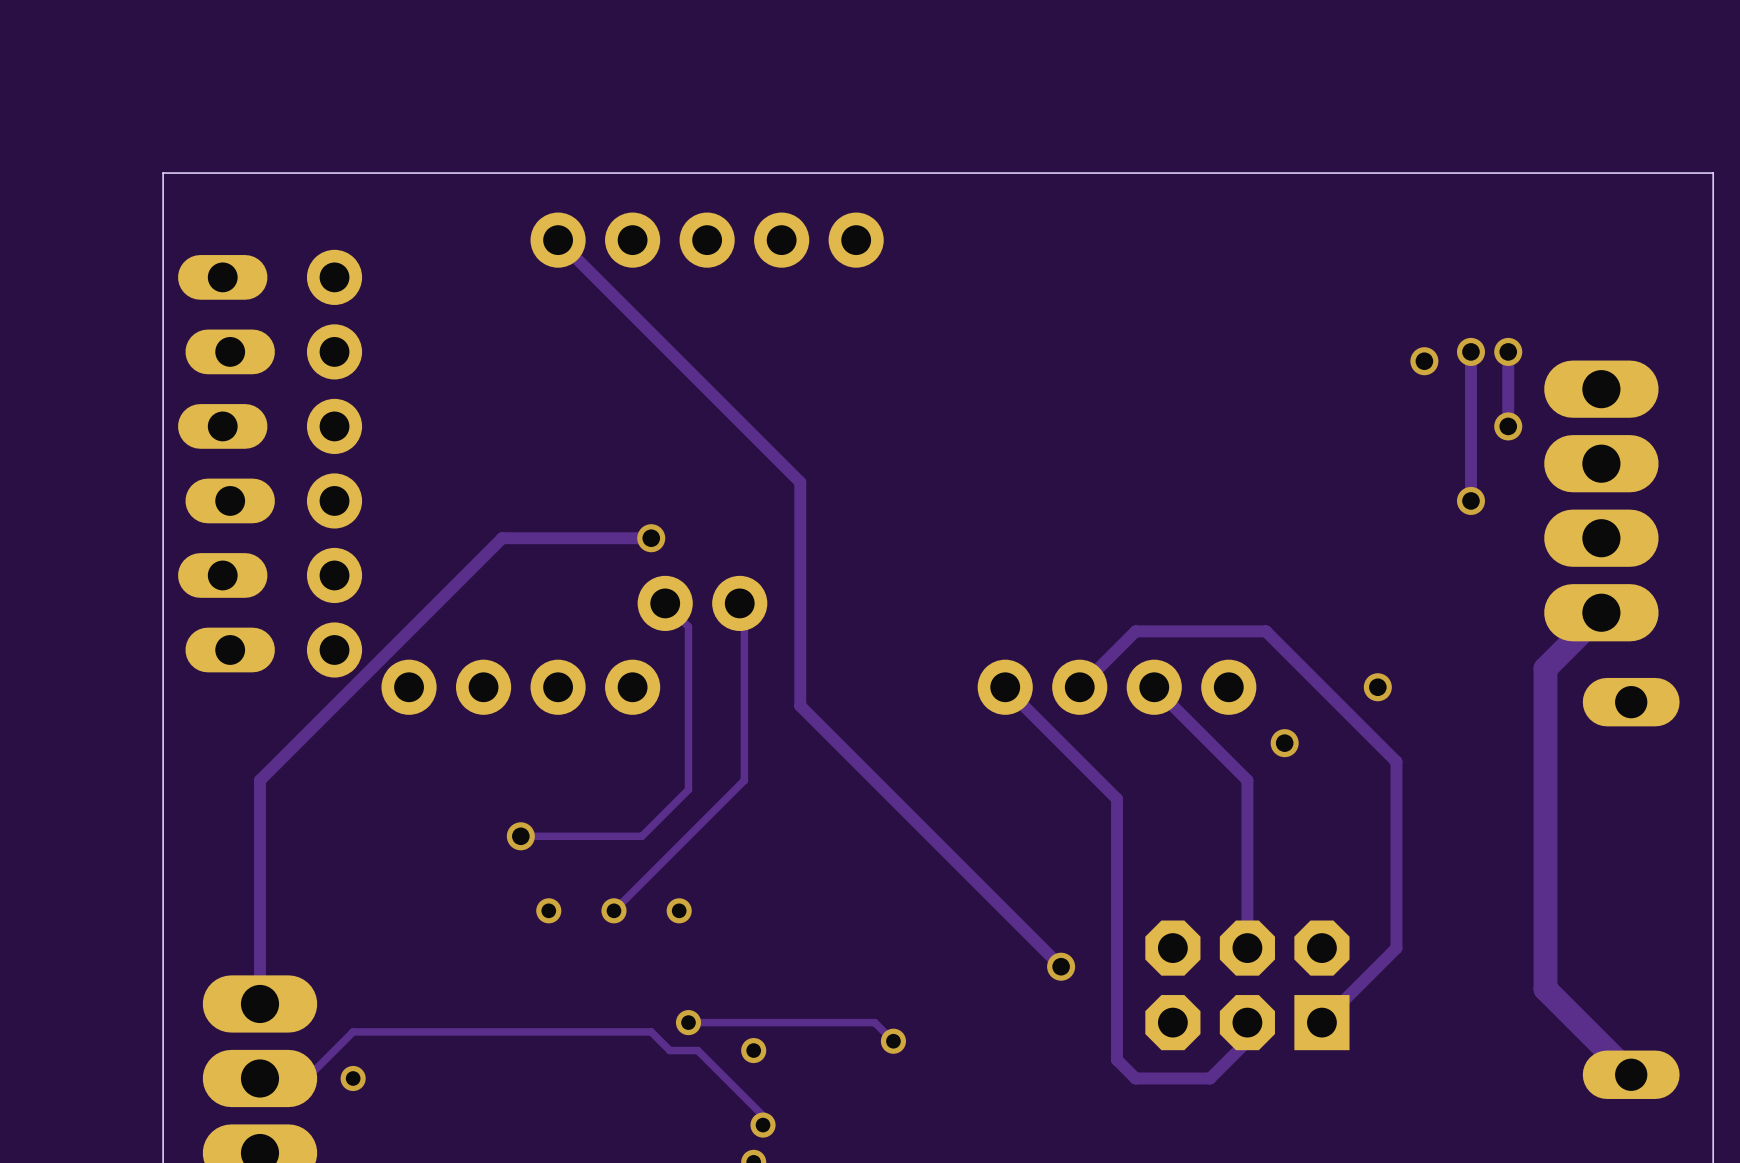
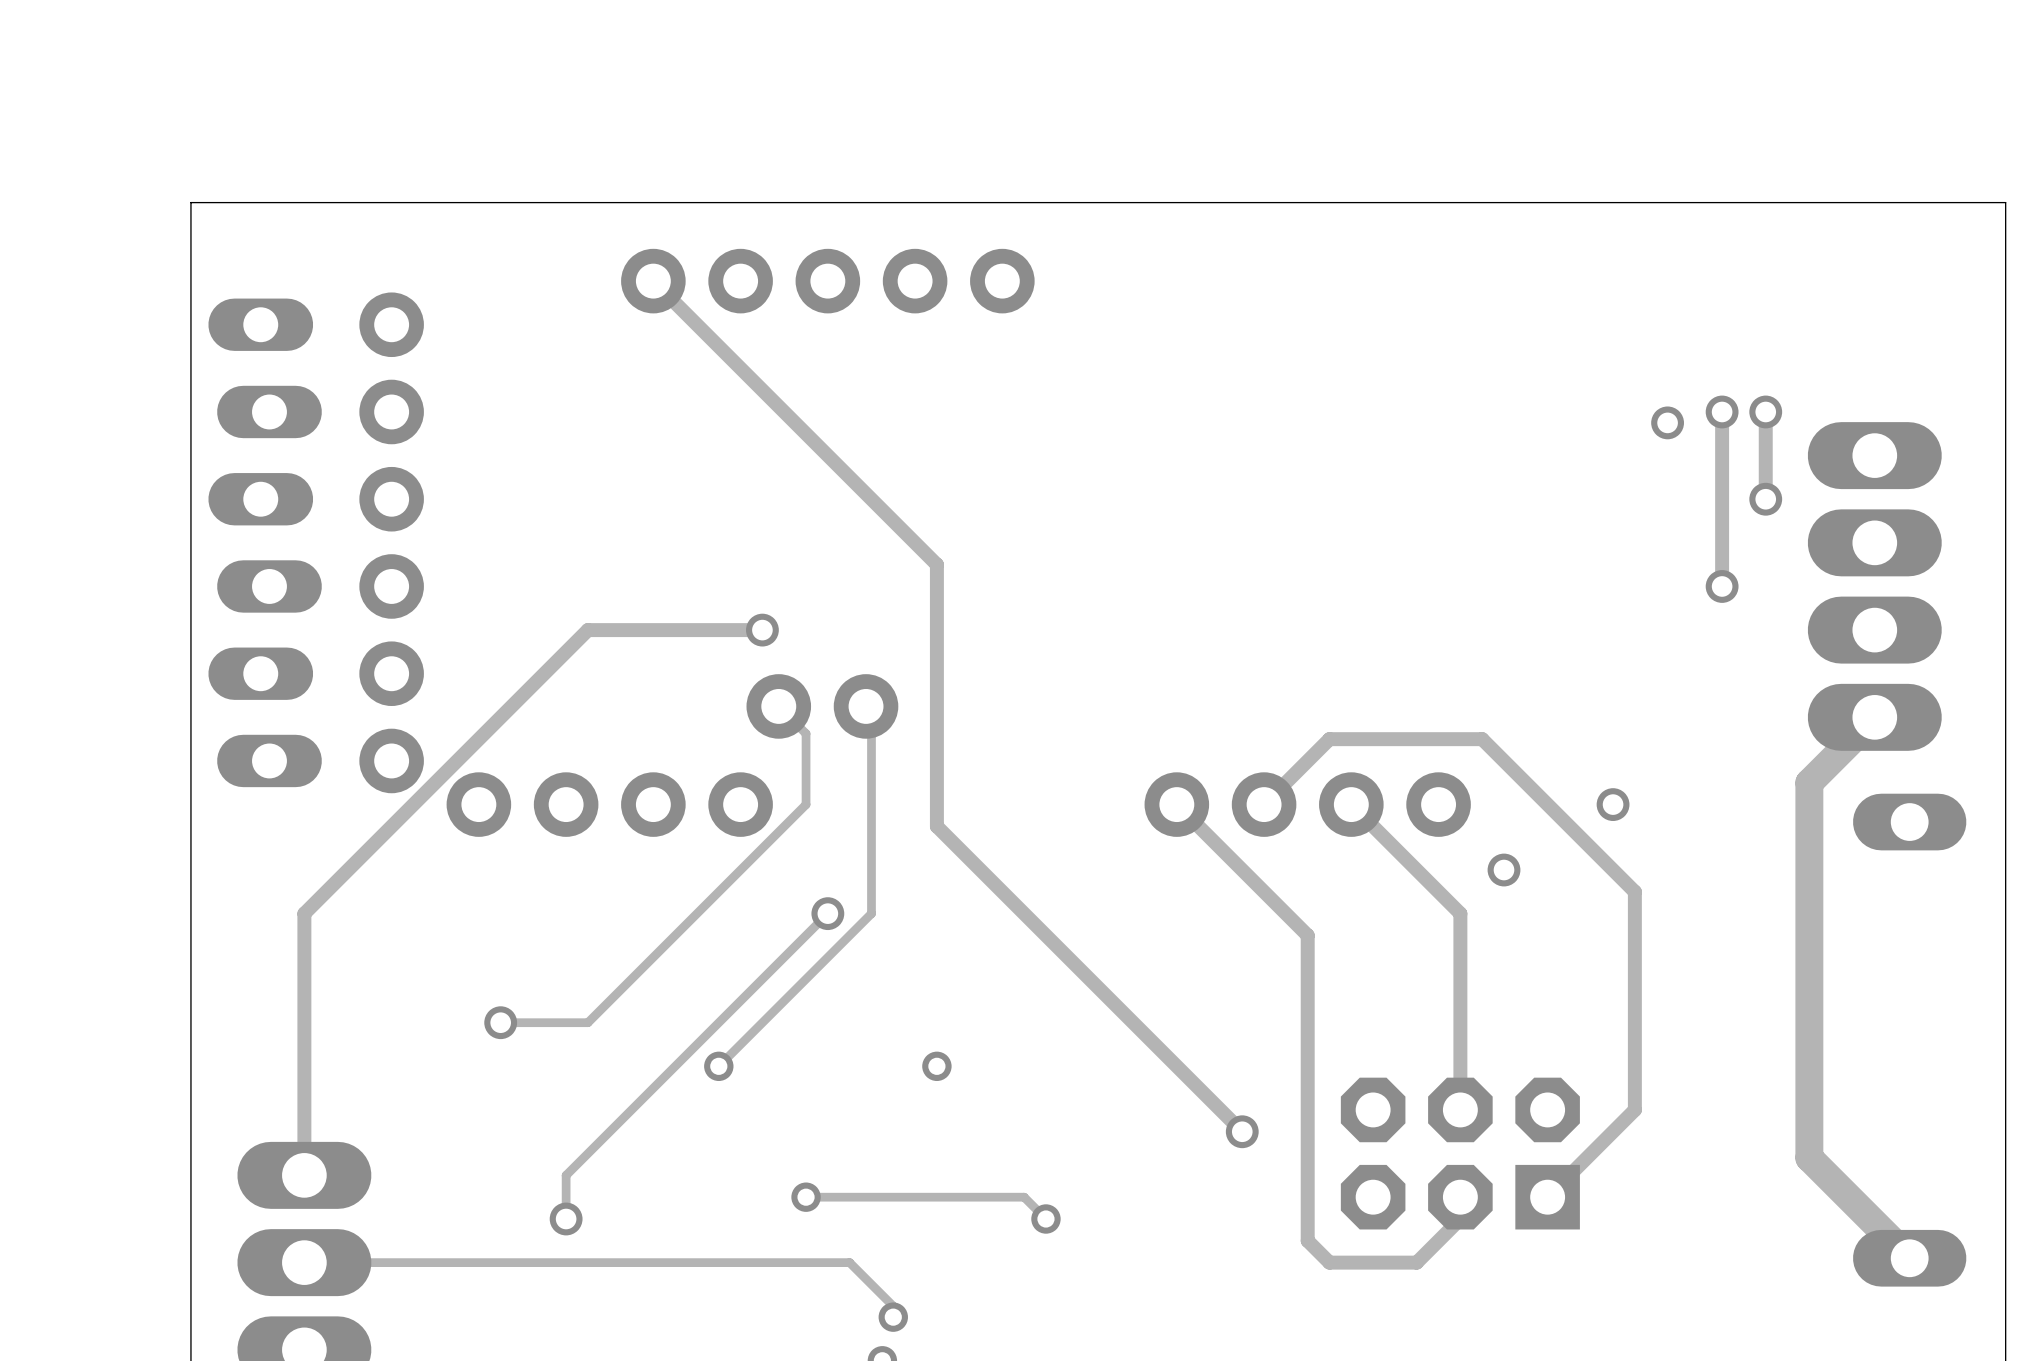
track: (688, 687) (688, 789) (641, 836) (520, 836) -> (806, 804) (587, 1022) (500, 1022)
track: none -> (827, 913) (566, 1175) (566, 1219)
via: none -> (827, 913)
via: (520, 836) -> none
via: none -> (500, 1022)
via: (548, 910) -> none
via: (679, 910) -> none
via: none -> (936, 1066)
via: none -> (566, 1219)
via: (753, 1050) -> none
via: (353, 1078) -> none
track: (725, 1078) (697, 1050) (669, 1050) (651, 1031) (353, 1031) (306, 1078) -> (849, 1262) (358, 1262)

